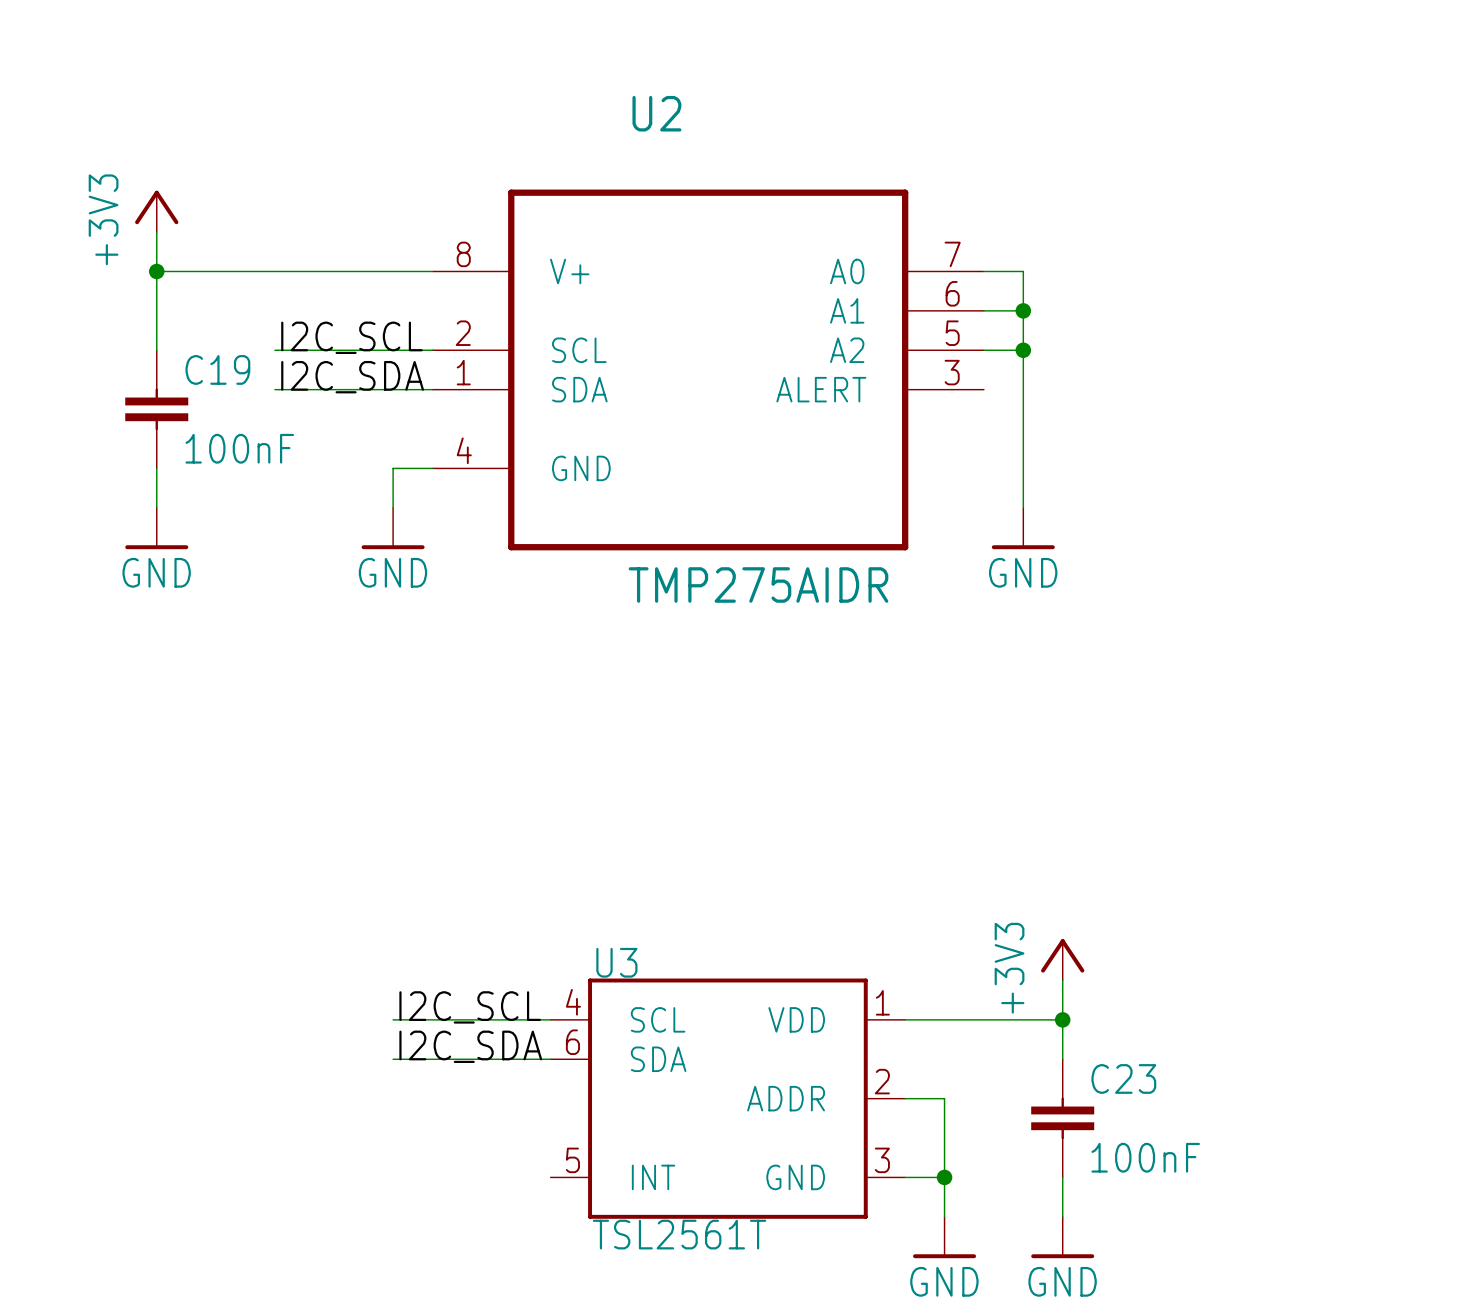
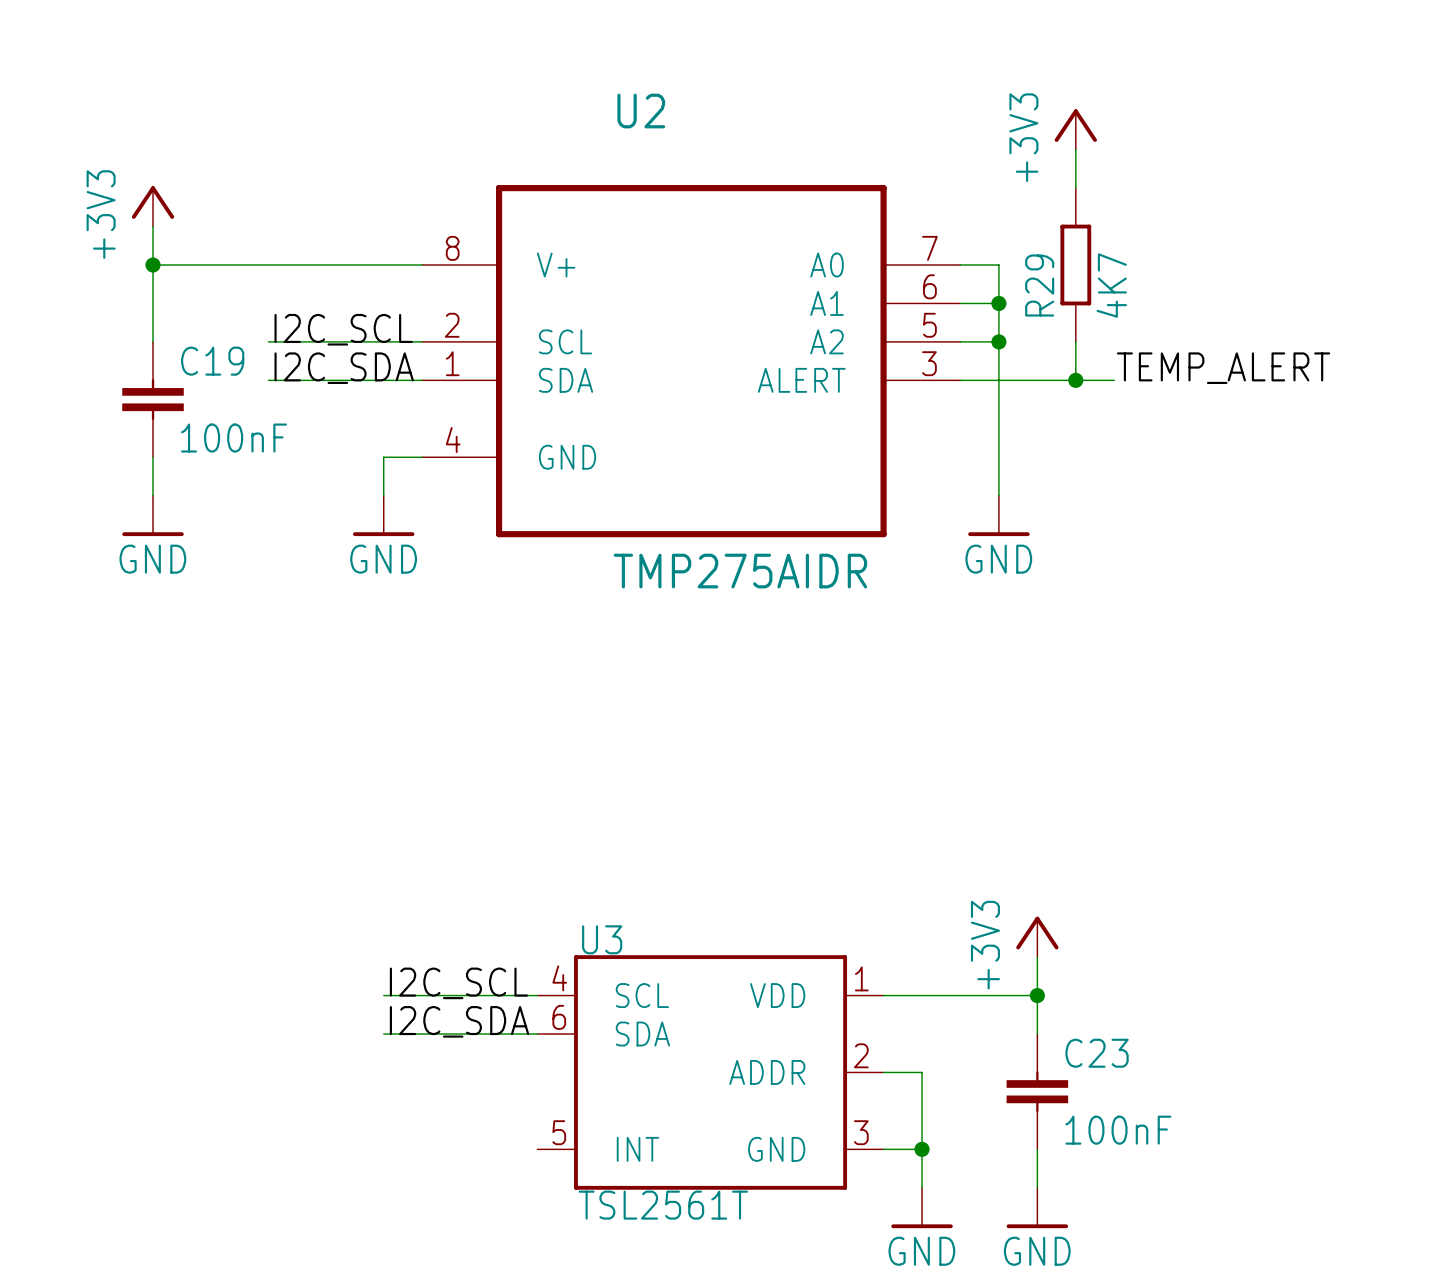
power symbol: none -> +3V3 (1075, 129)
wire: none -> (1075, 149) (1075, 188)
R29: none -> 4K7 (1075, 265)
wire: none -> (1075, 341) (1075, 380)
label: none -> TEMP_ALERT (1223, 368)
wire: none -> (960, 380) (1114, 380)
junction: none -> (1075, 380)

